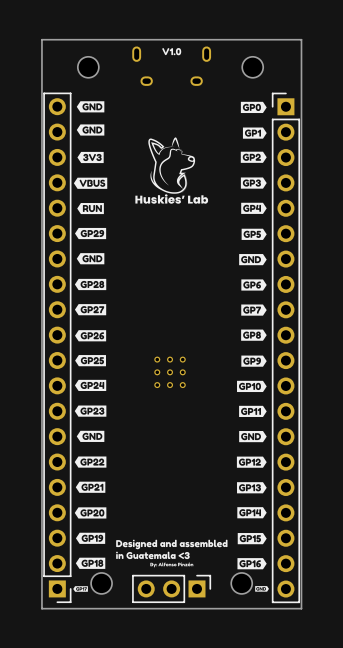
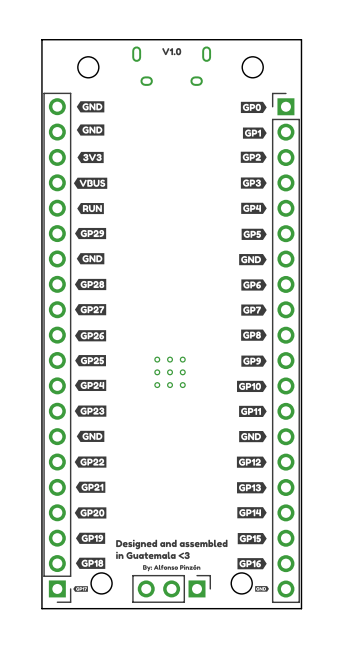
drawing: [135, 137, 209, 204] -> none
drawing shape: [150, 562, 194, 568] -> [143, 564, 201, 572]

